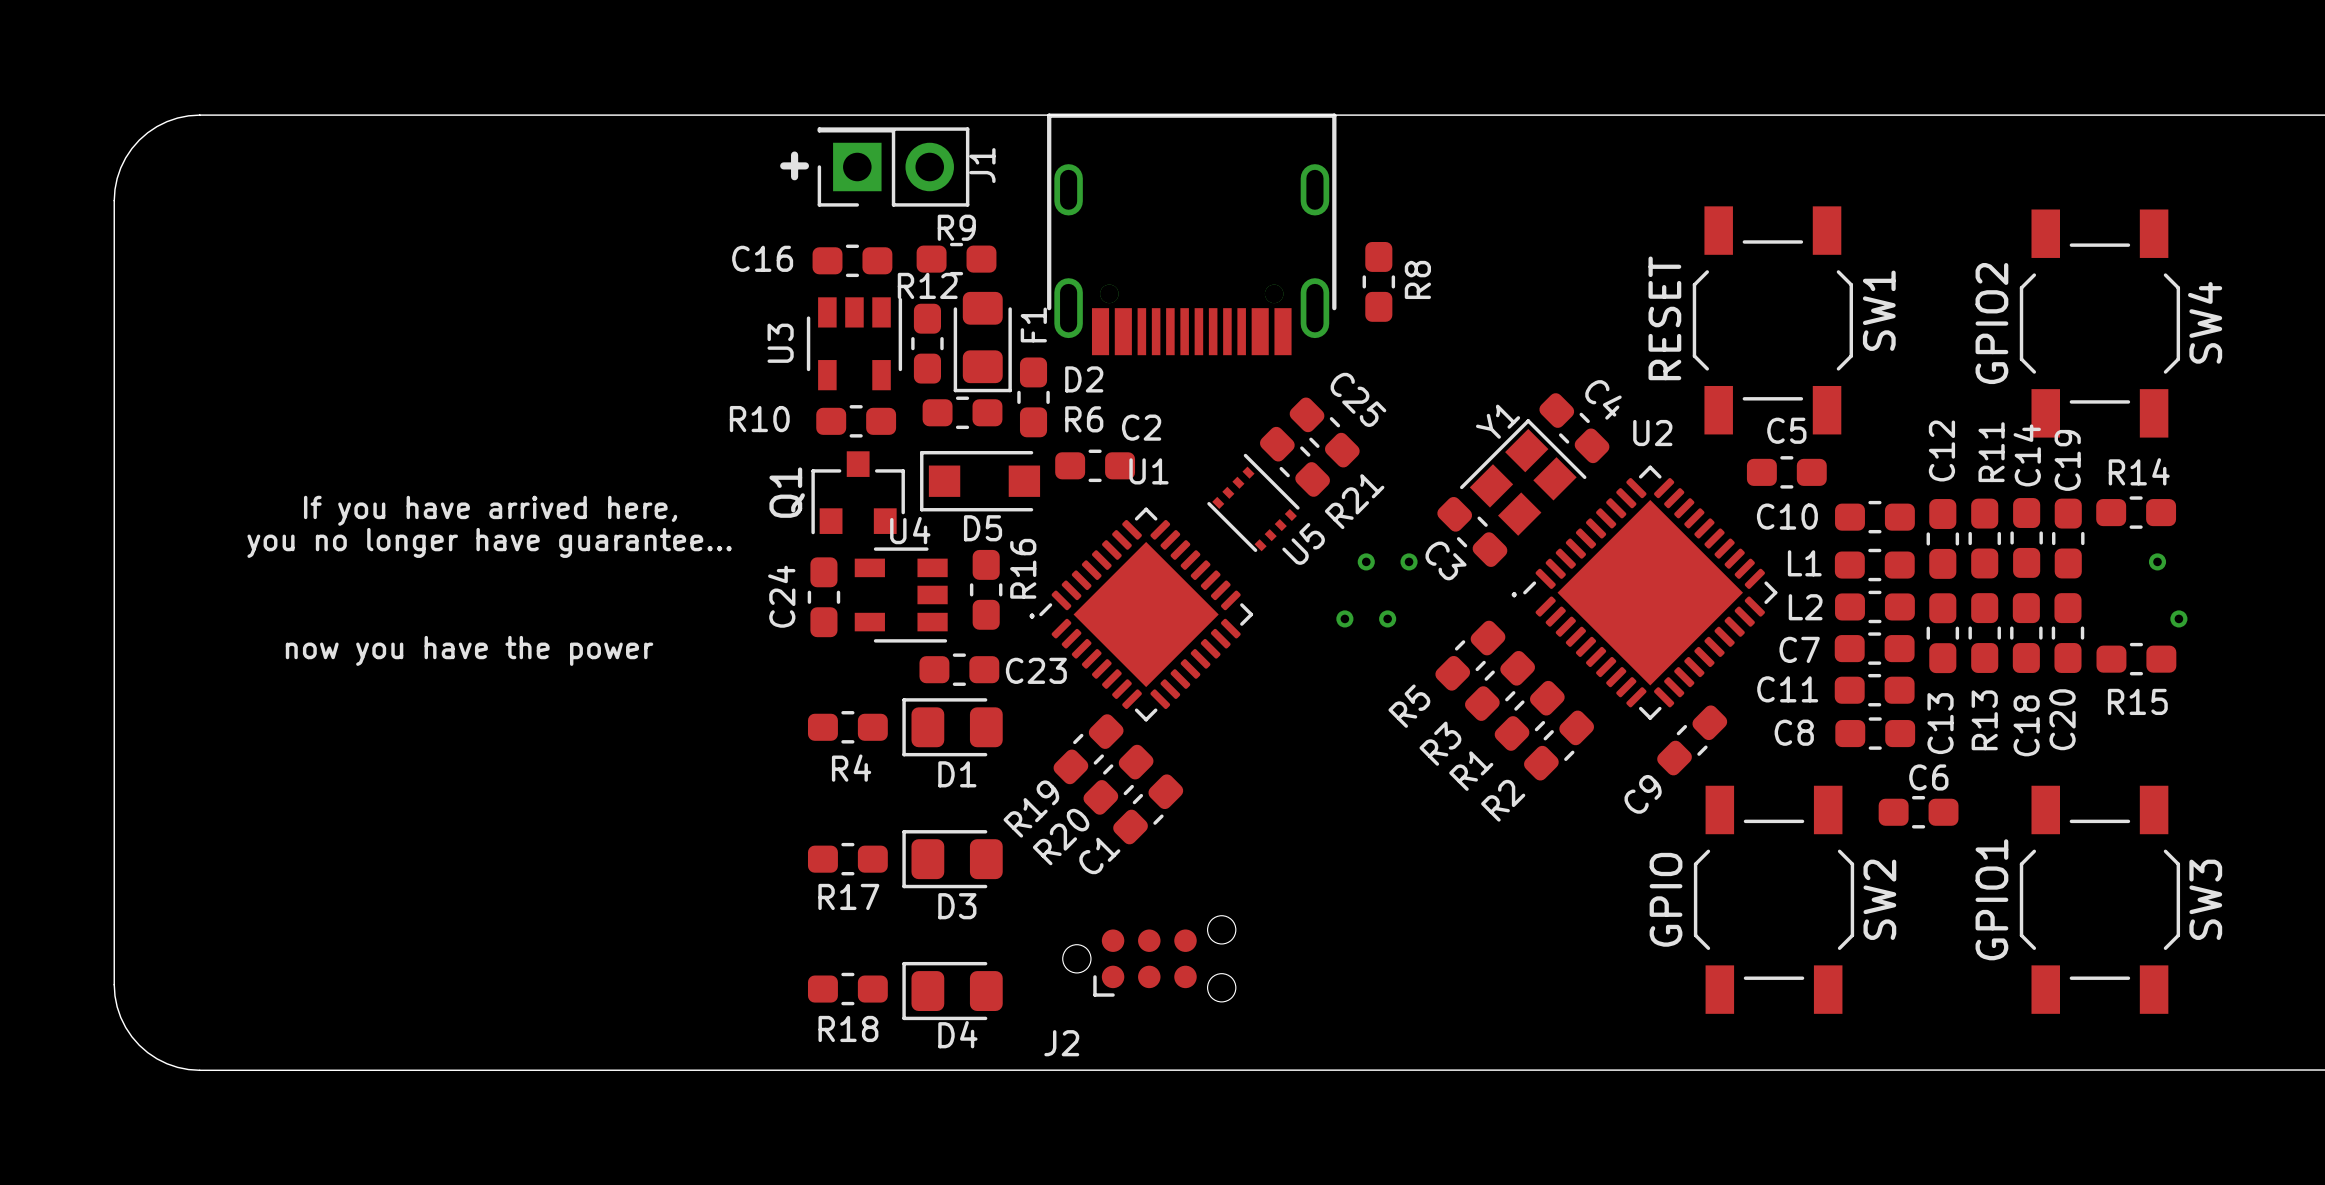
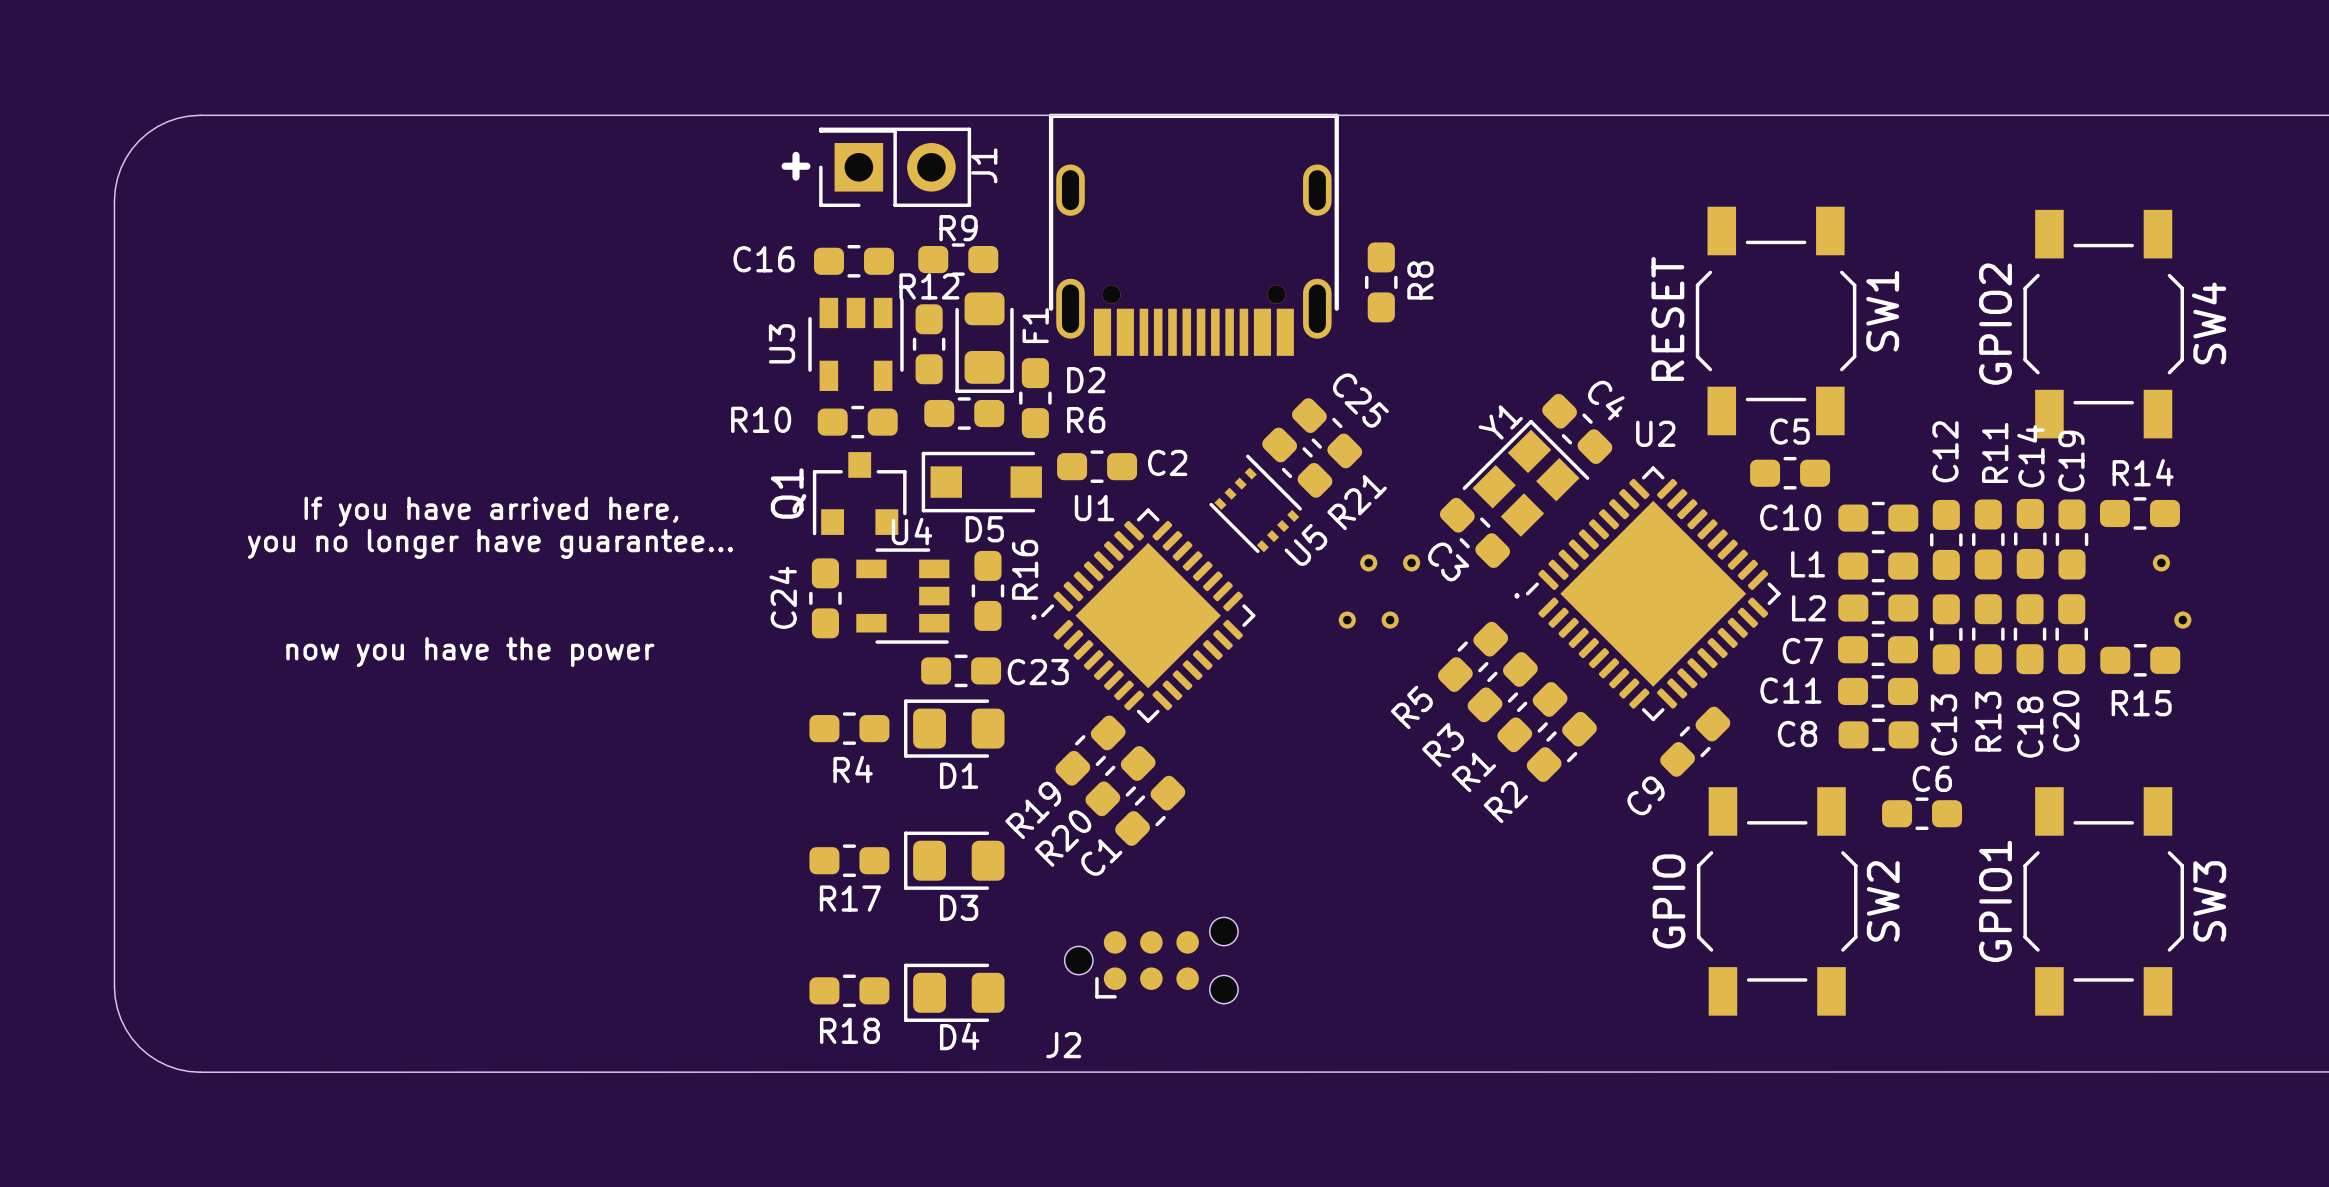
C2 name position: C2 (1141, 427) -> C2 (1167, 462)
U1 name position: U1 (1148, 471) -> U1 (1094, 508)

